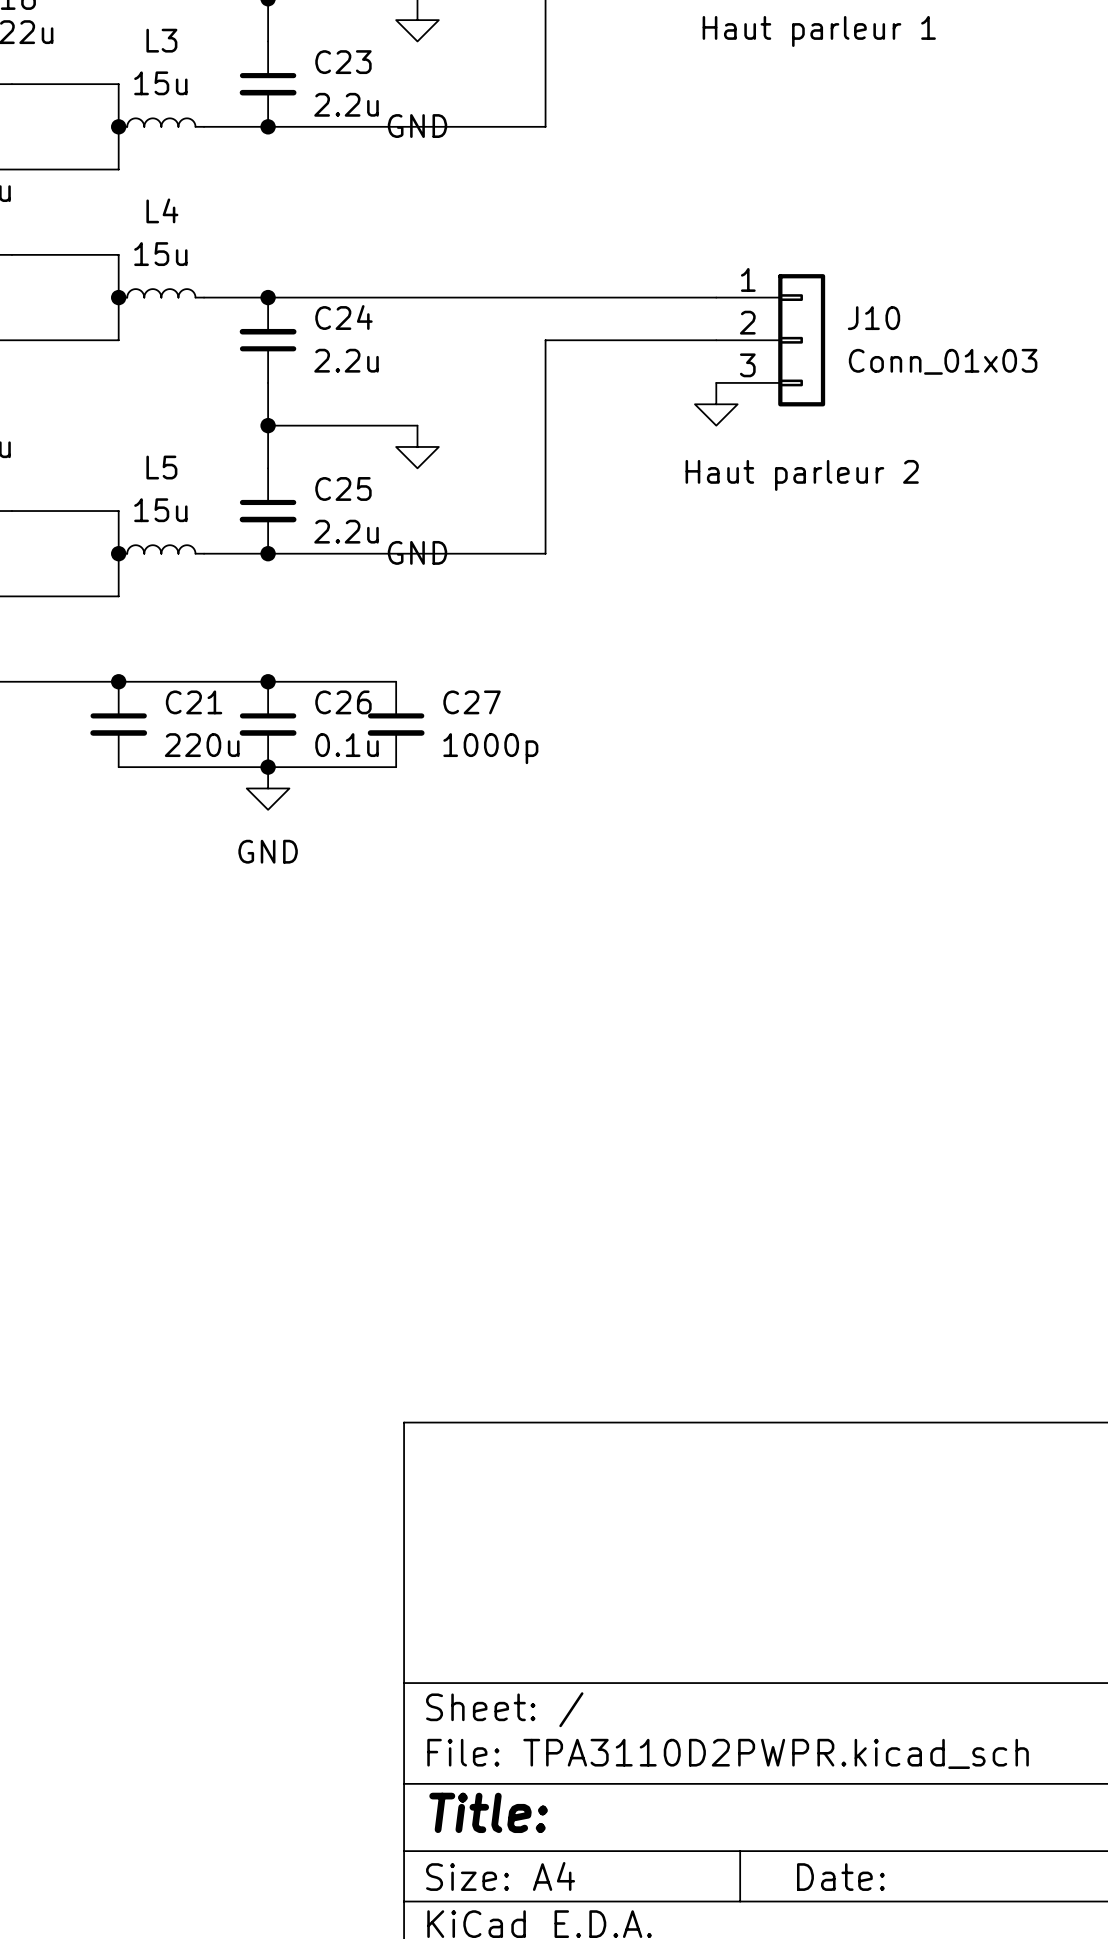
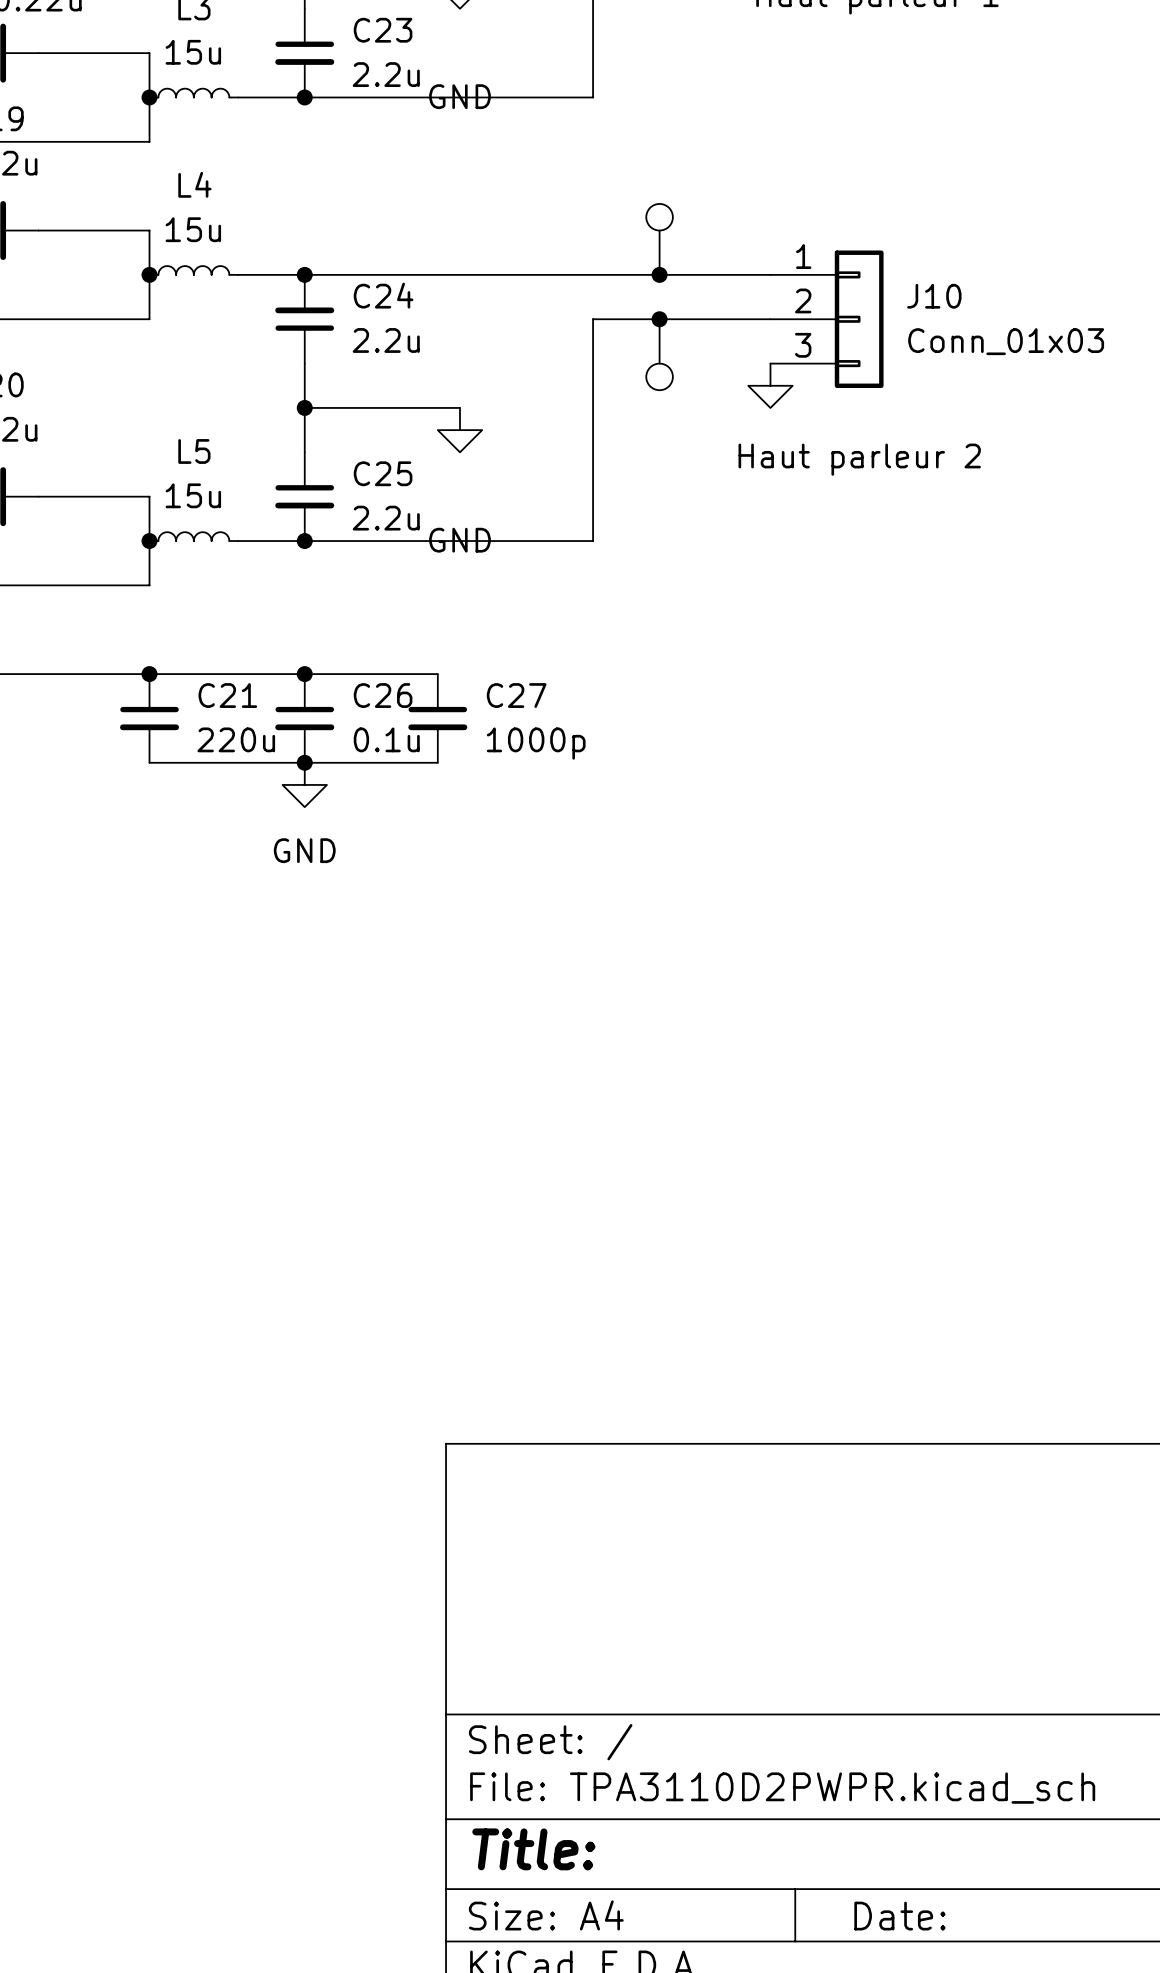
part: none -> (659, 239)
junction: none -> (659, 274)
junction: none -> (659, 319)
part: none -> (659, 354)

